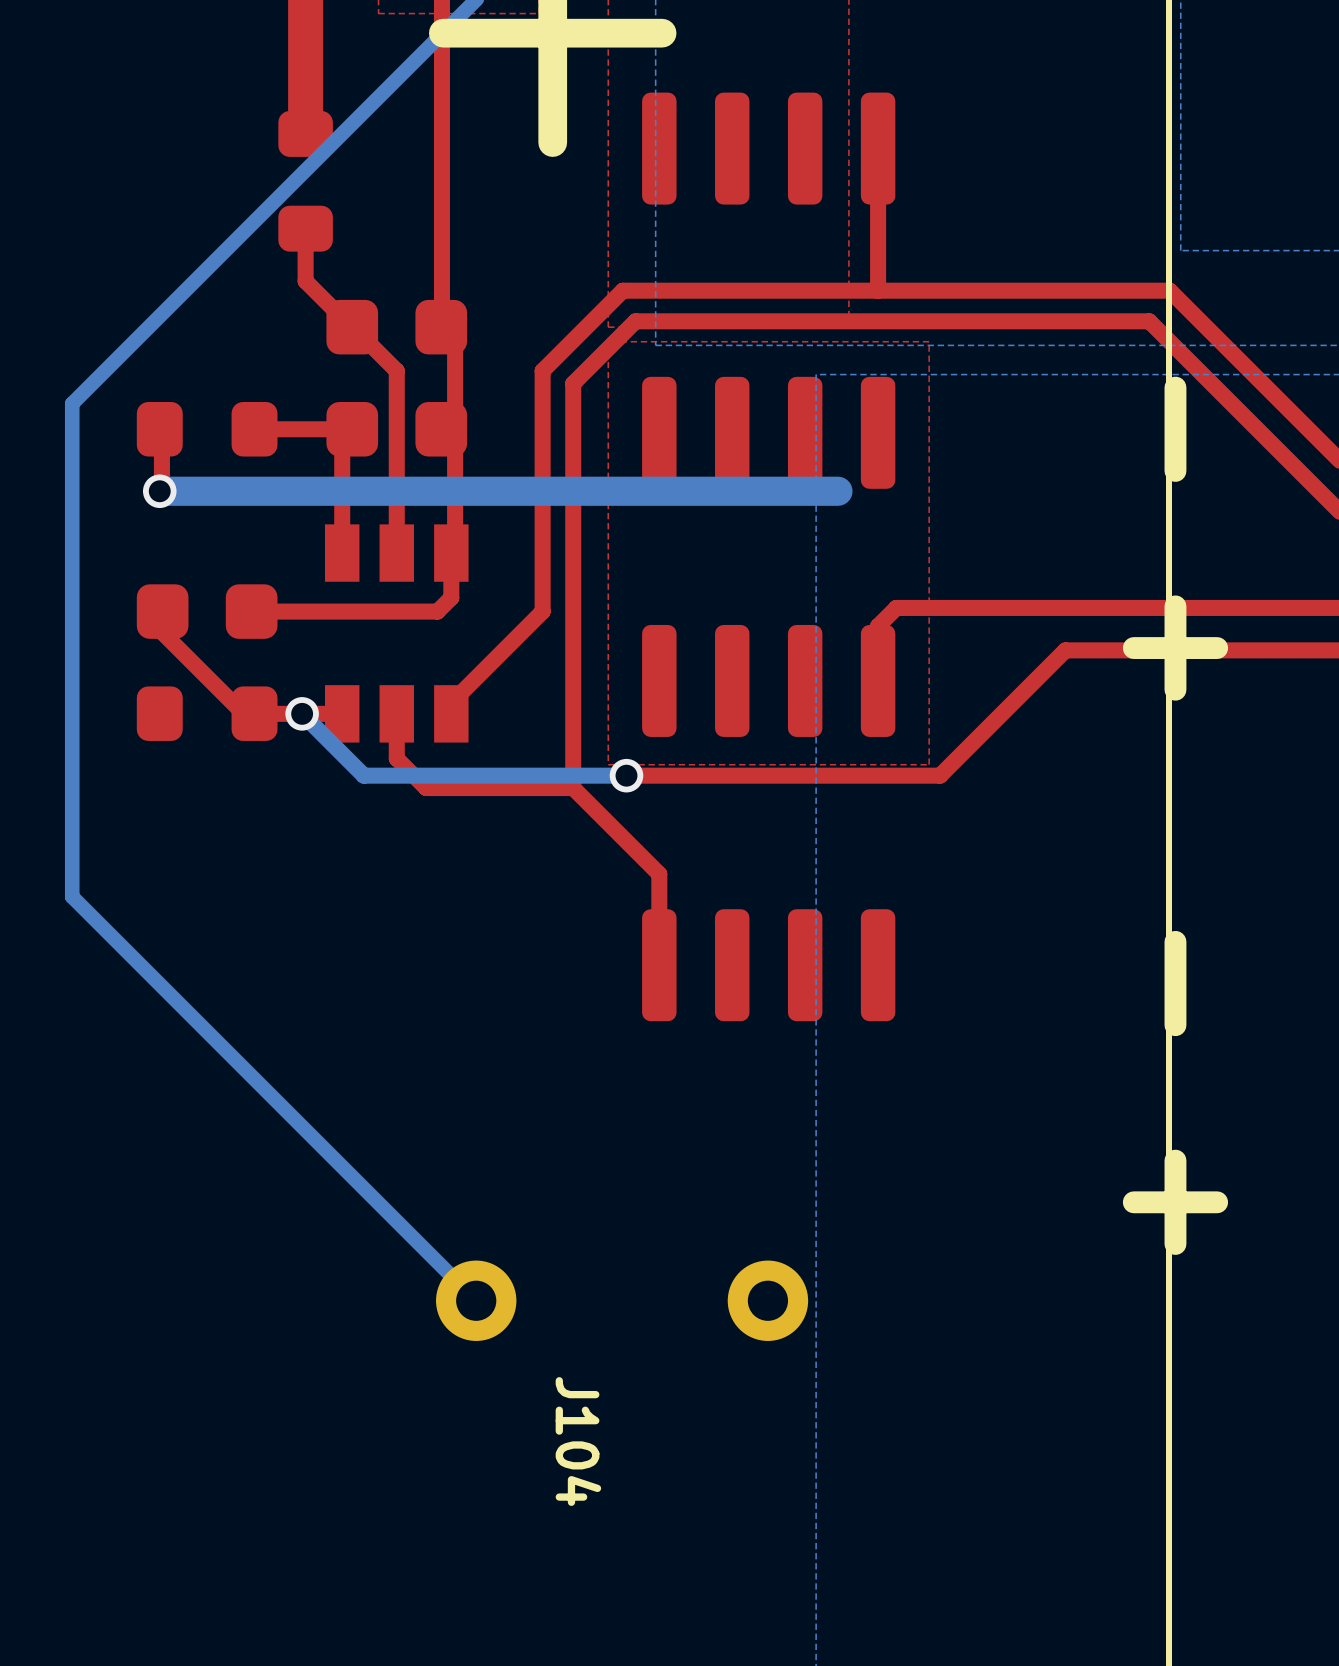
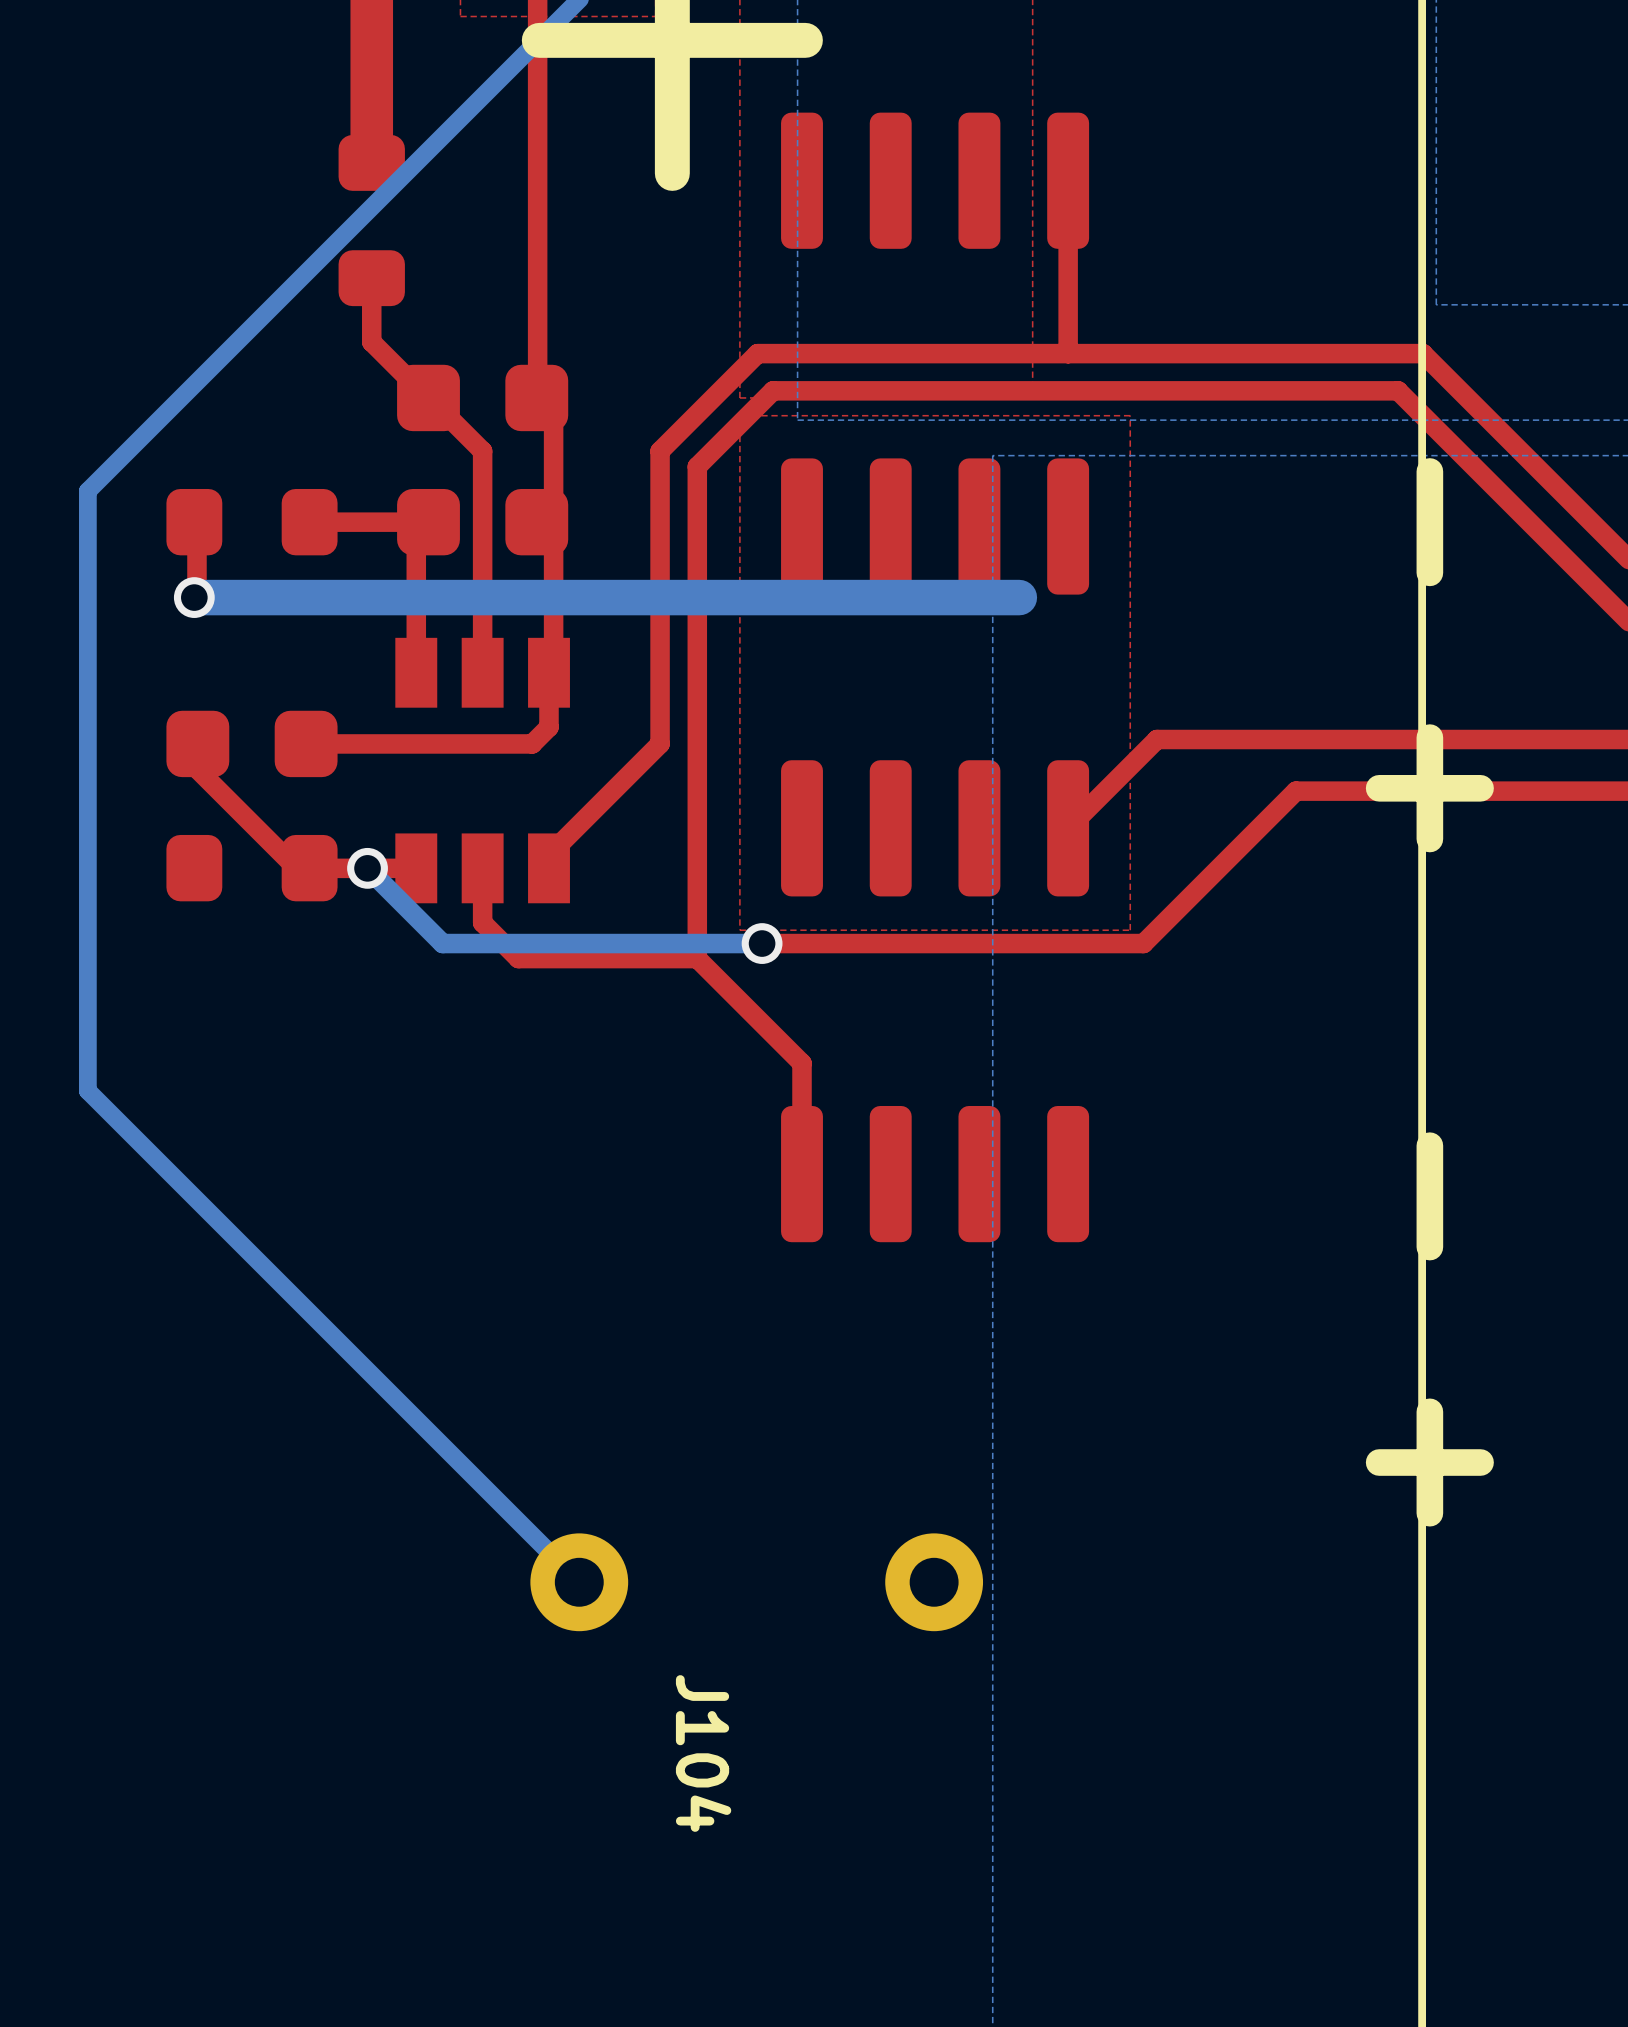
top track: (951, 607) (896, 607) (878, 626) (878, 680) -> (1156, 739) (1068, 828)

